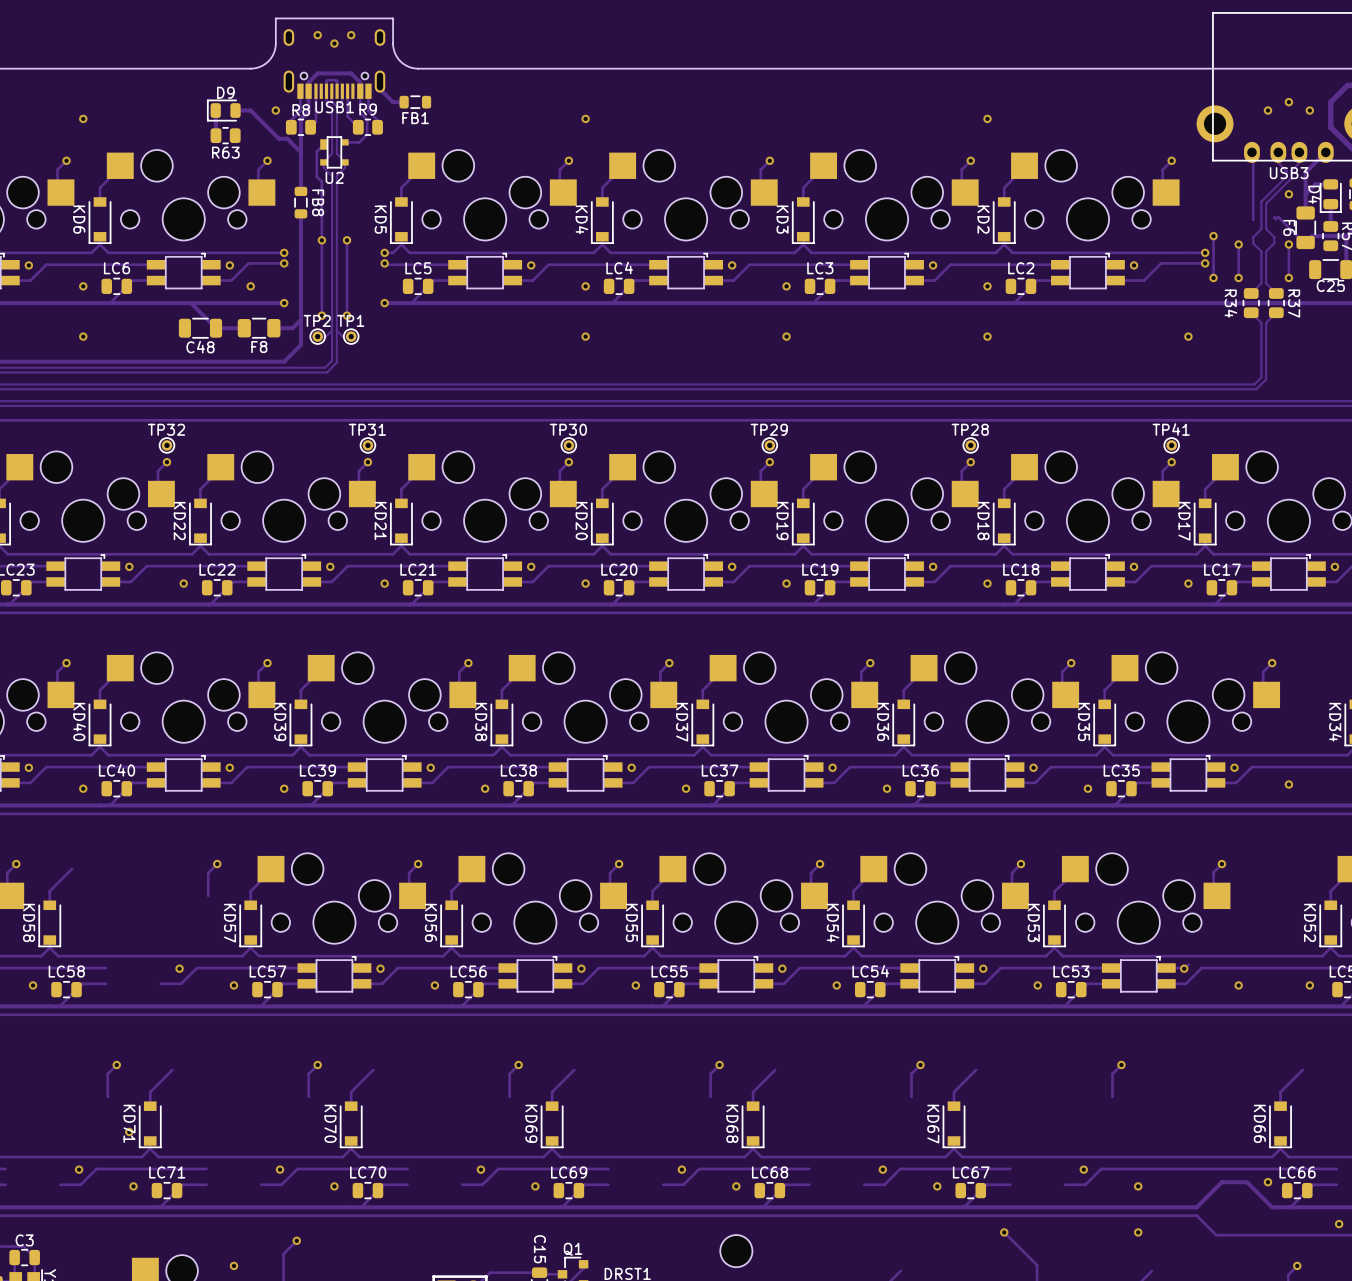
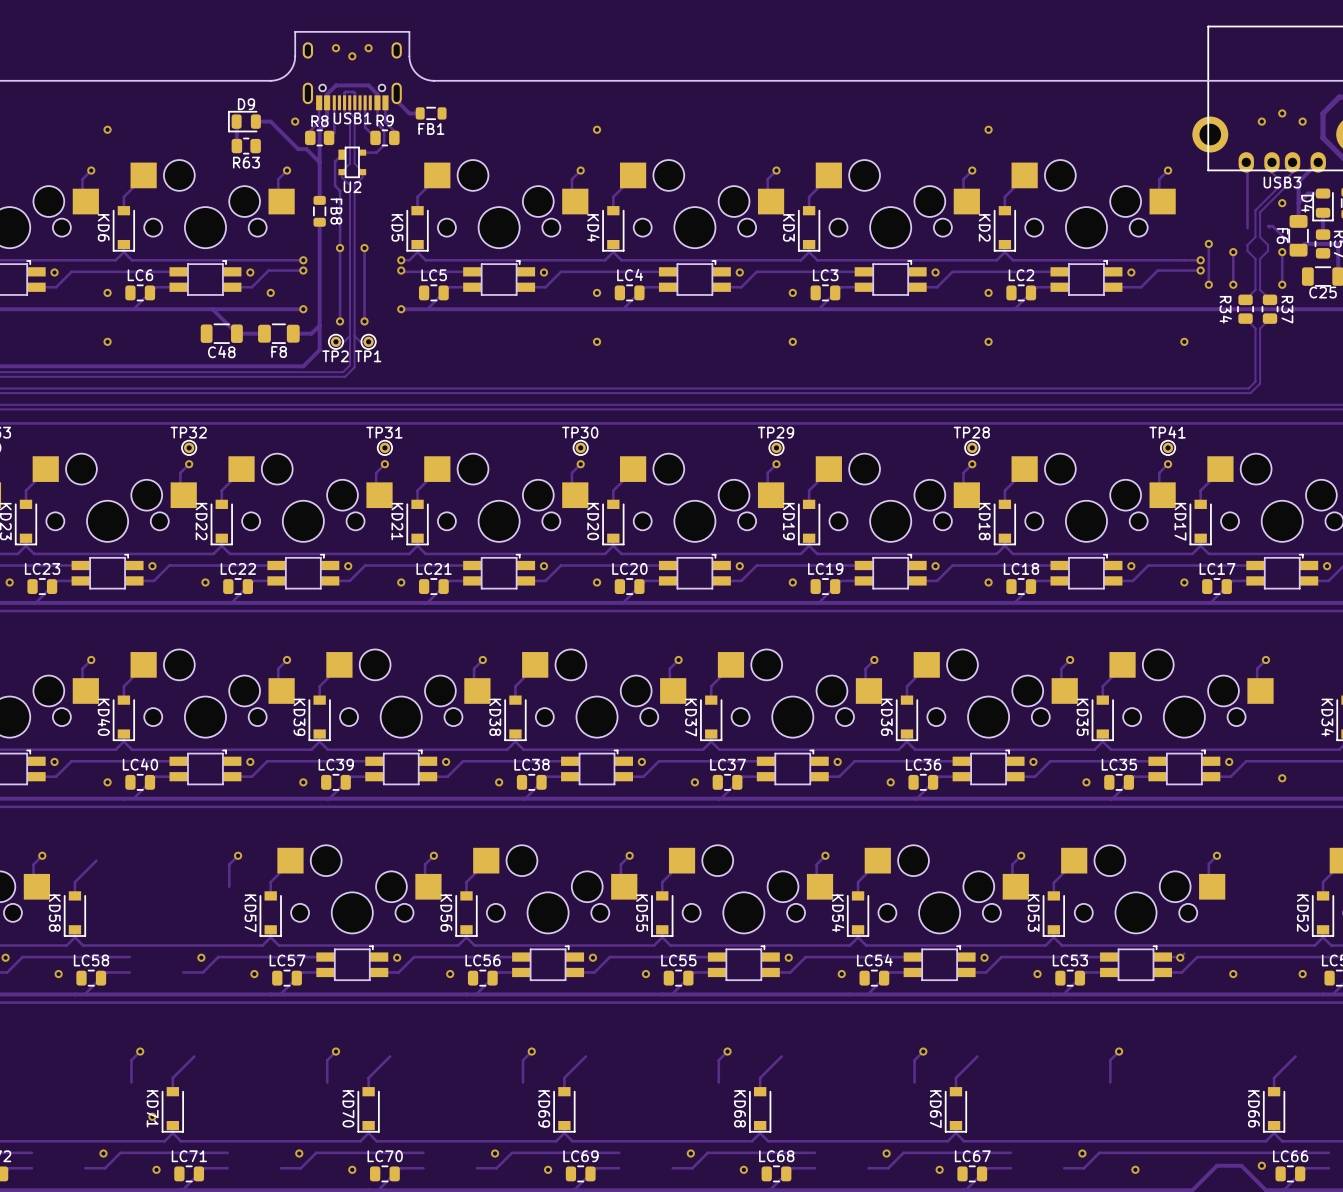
TP2 name position: TP2 (317, 320) -> TP2 (335, 356)
TP1 name position: TP1 (350, 320) -> TP1 (368, 356)

